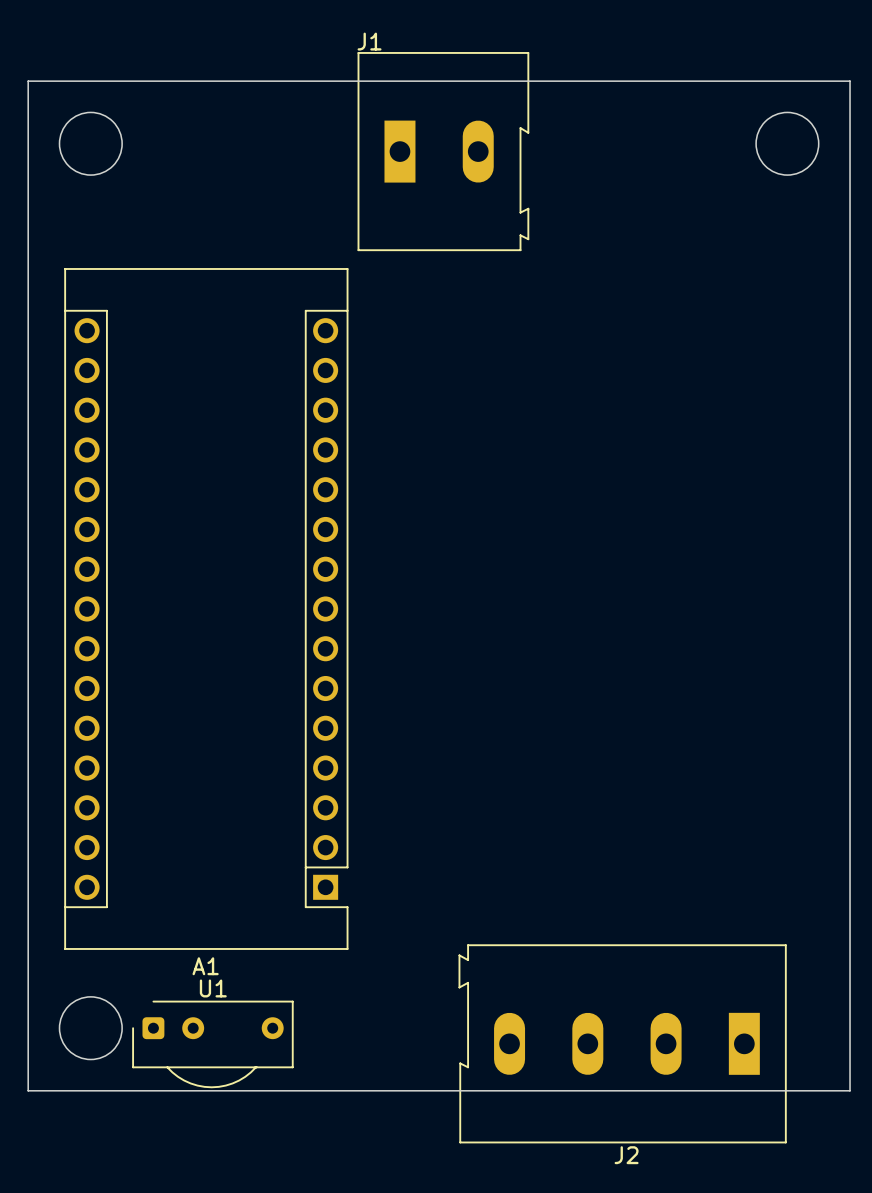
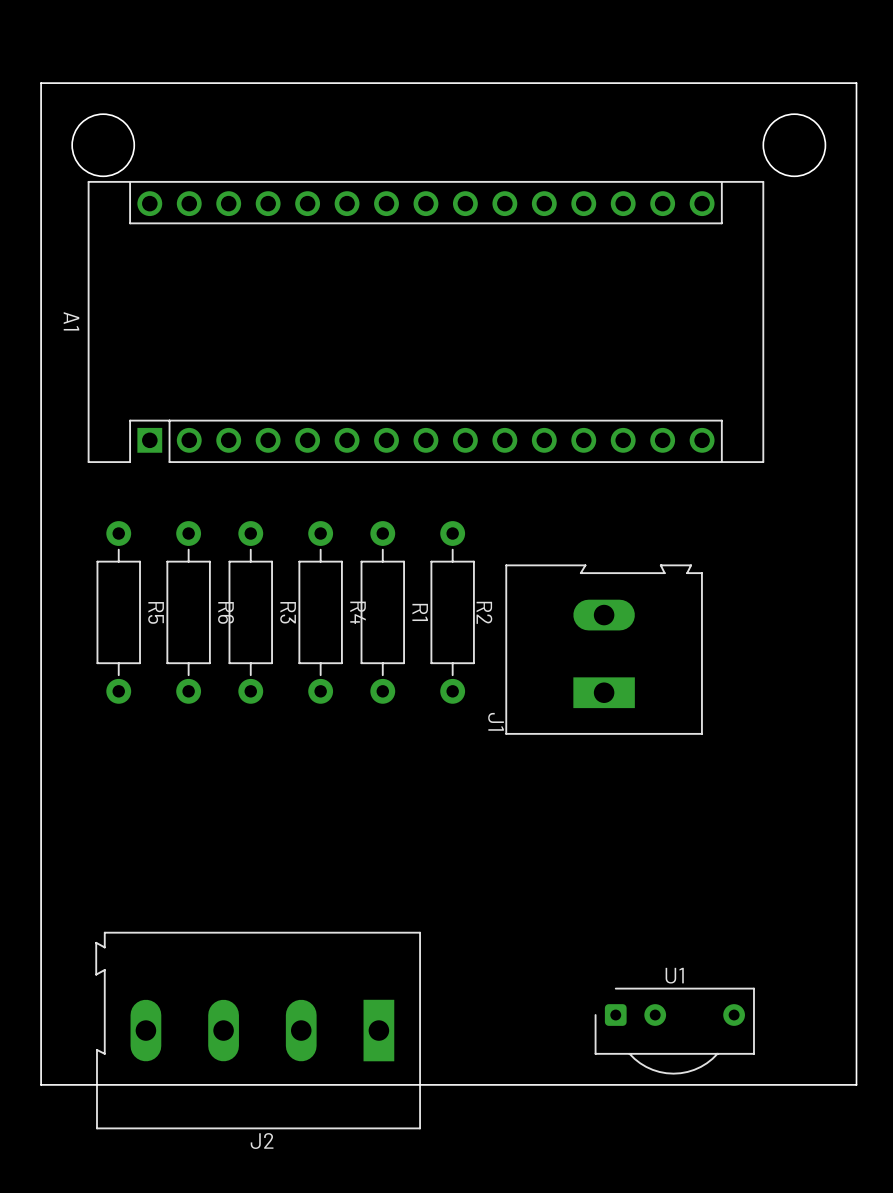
J1 rotation: 0° (443, 151) -> 90° counterclockwise (604, 649)
J1 position: (443, 151) -> (604, 649)
A1 rotation: 0° (206, 608) -> 90° clockwise (425, 321)
R5: none -> (118, 612)
R6: none -> (188, 612)
R3: none -> (250, 612)
R4: none -> (320, 612)
R1: none -> (382, 612)
R2: none -> (452, 612)
round board edge: [59, 996, 123, 1060] -> none
J2 position: (622, 1043) -> (258, 1030)
U1 position: (212, 1044) -> (674, 1031)

